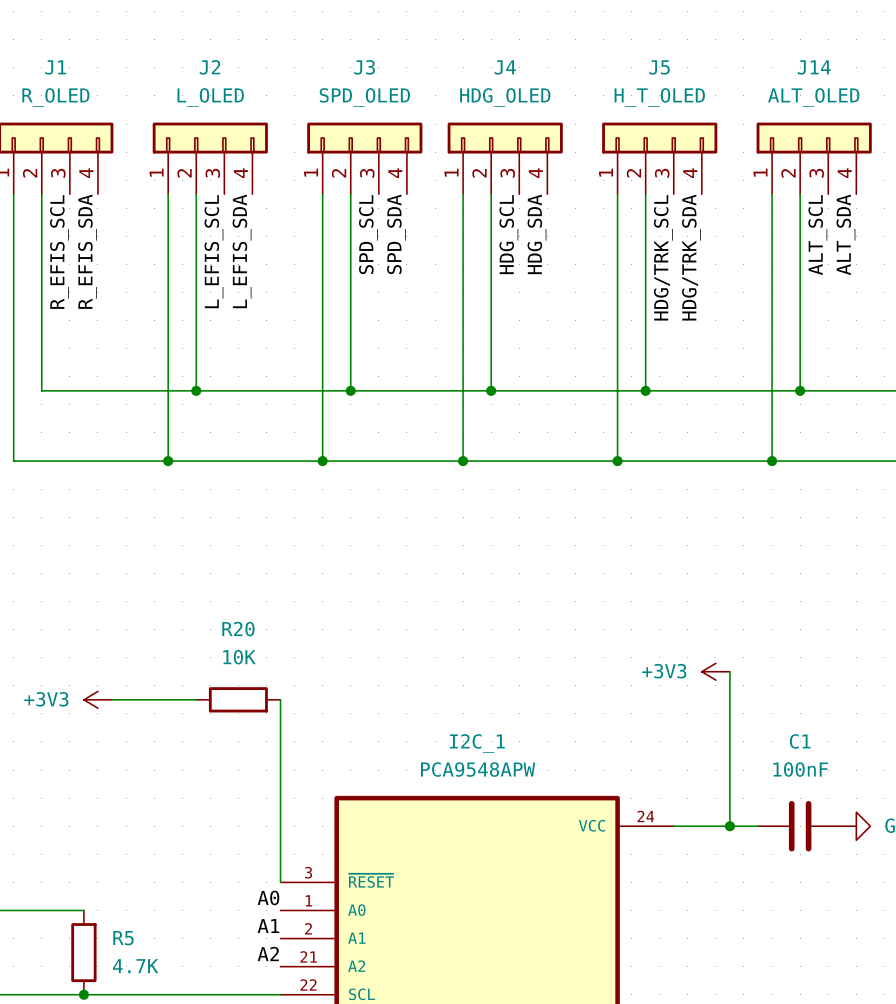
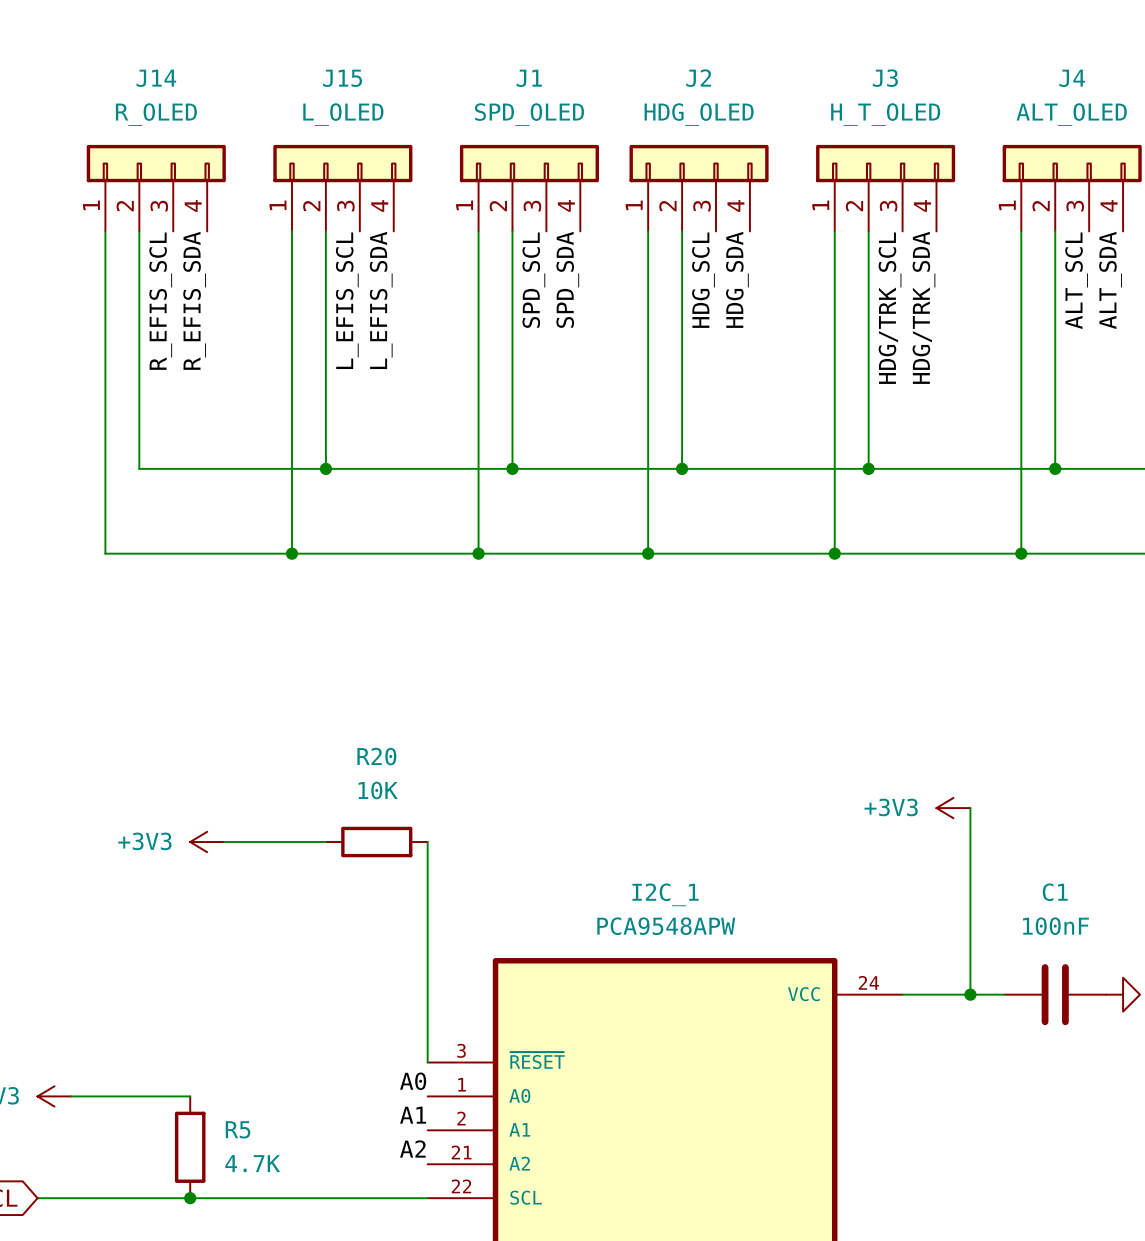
J1 name: J1 (55, 67) -> J14 (156, 78)
J2 name: J2 (210, 67) -> J15 (342, 78)
J3 name: J3 (364, 67) -> J1 (529, 78)
J4 name: J4 (505, 67) -> J2 (698, 78)
J5 name: J5 (659, 67) -> J3 (885, 78)
J14 name: J14 (814, 67) -> J4 (1072, 78)

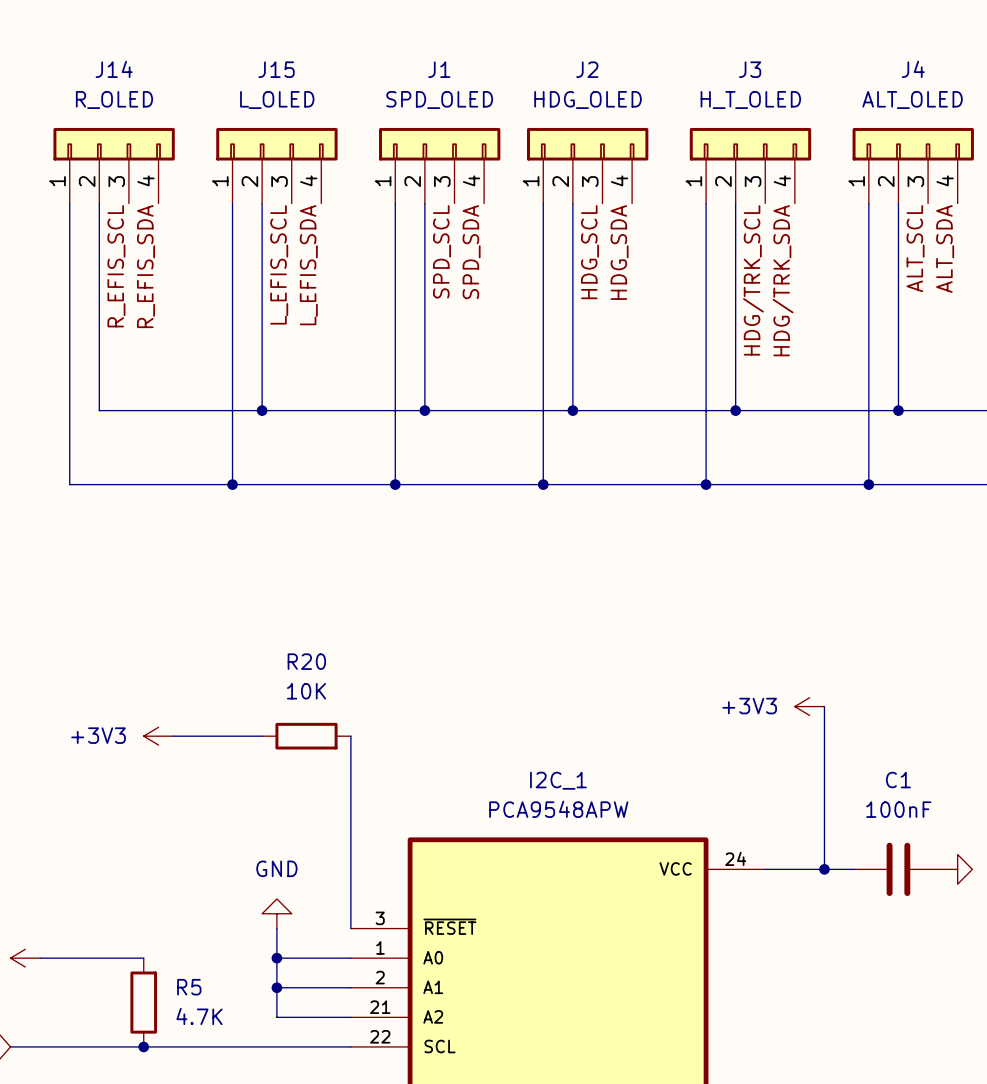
power symbol: none -> GND (276, 913)
wire: none -> (276, 928) (276, 1017) (350, 1017)
label: A0 (413, 1081) -> none
wire: none -> (276, 958) (350, 958)
junction: none -> (276, 958)
label: A1 (413, 1115) -> none
wire: none -> (276, 987) (350, 987)
junction: none -> (276, 987)
label: A2 (412, 1148) -> none

